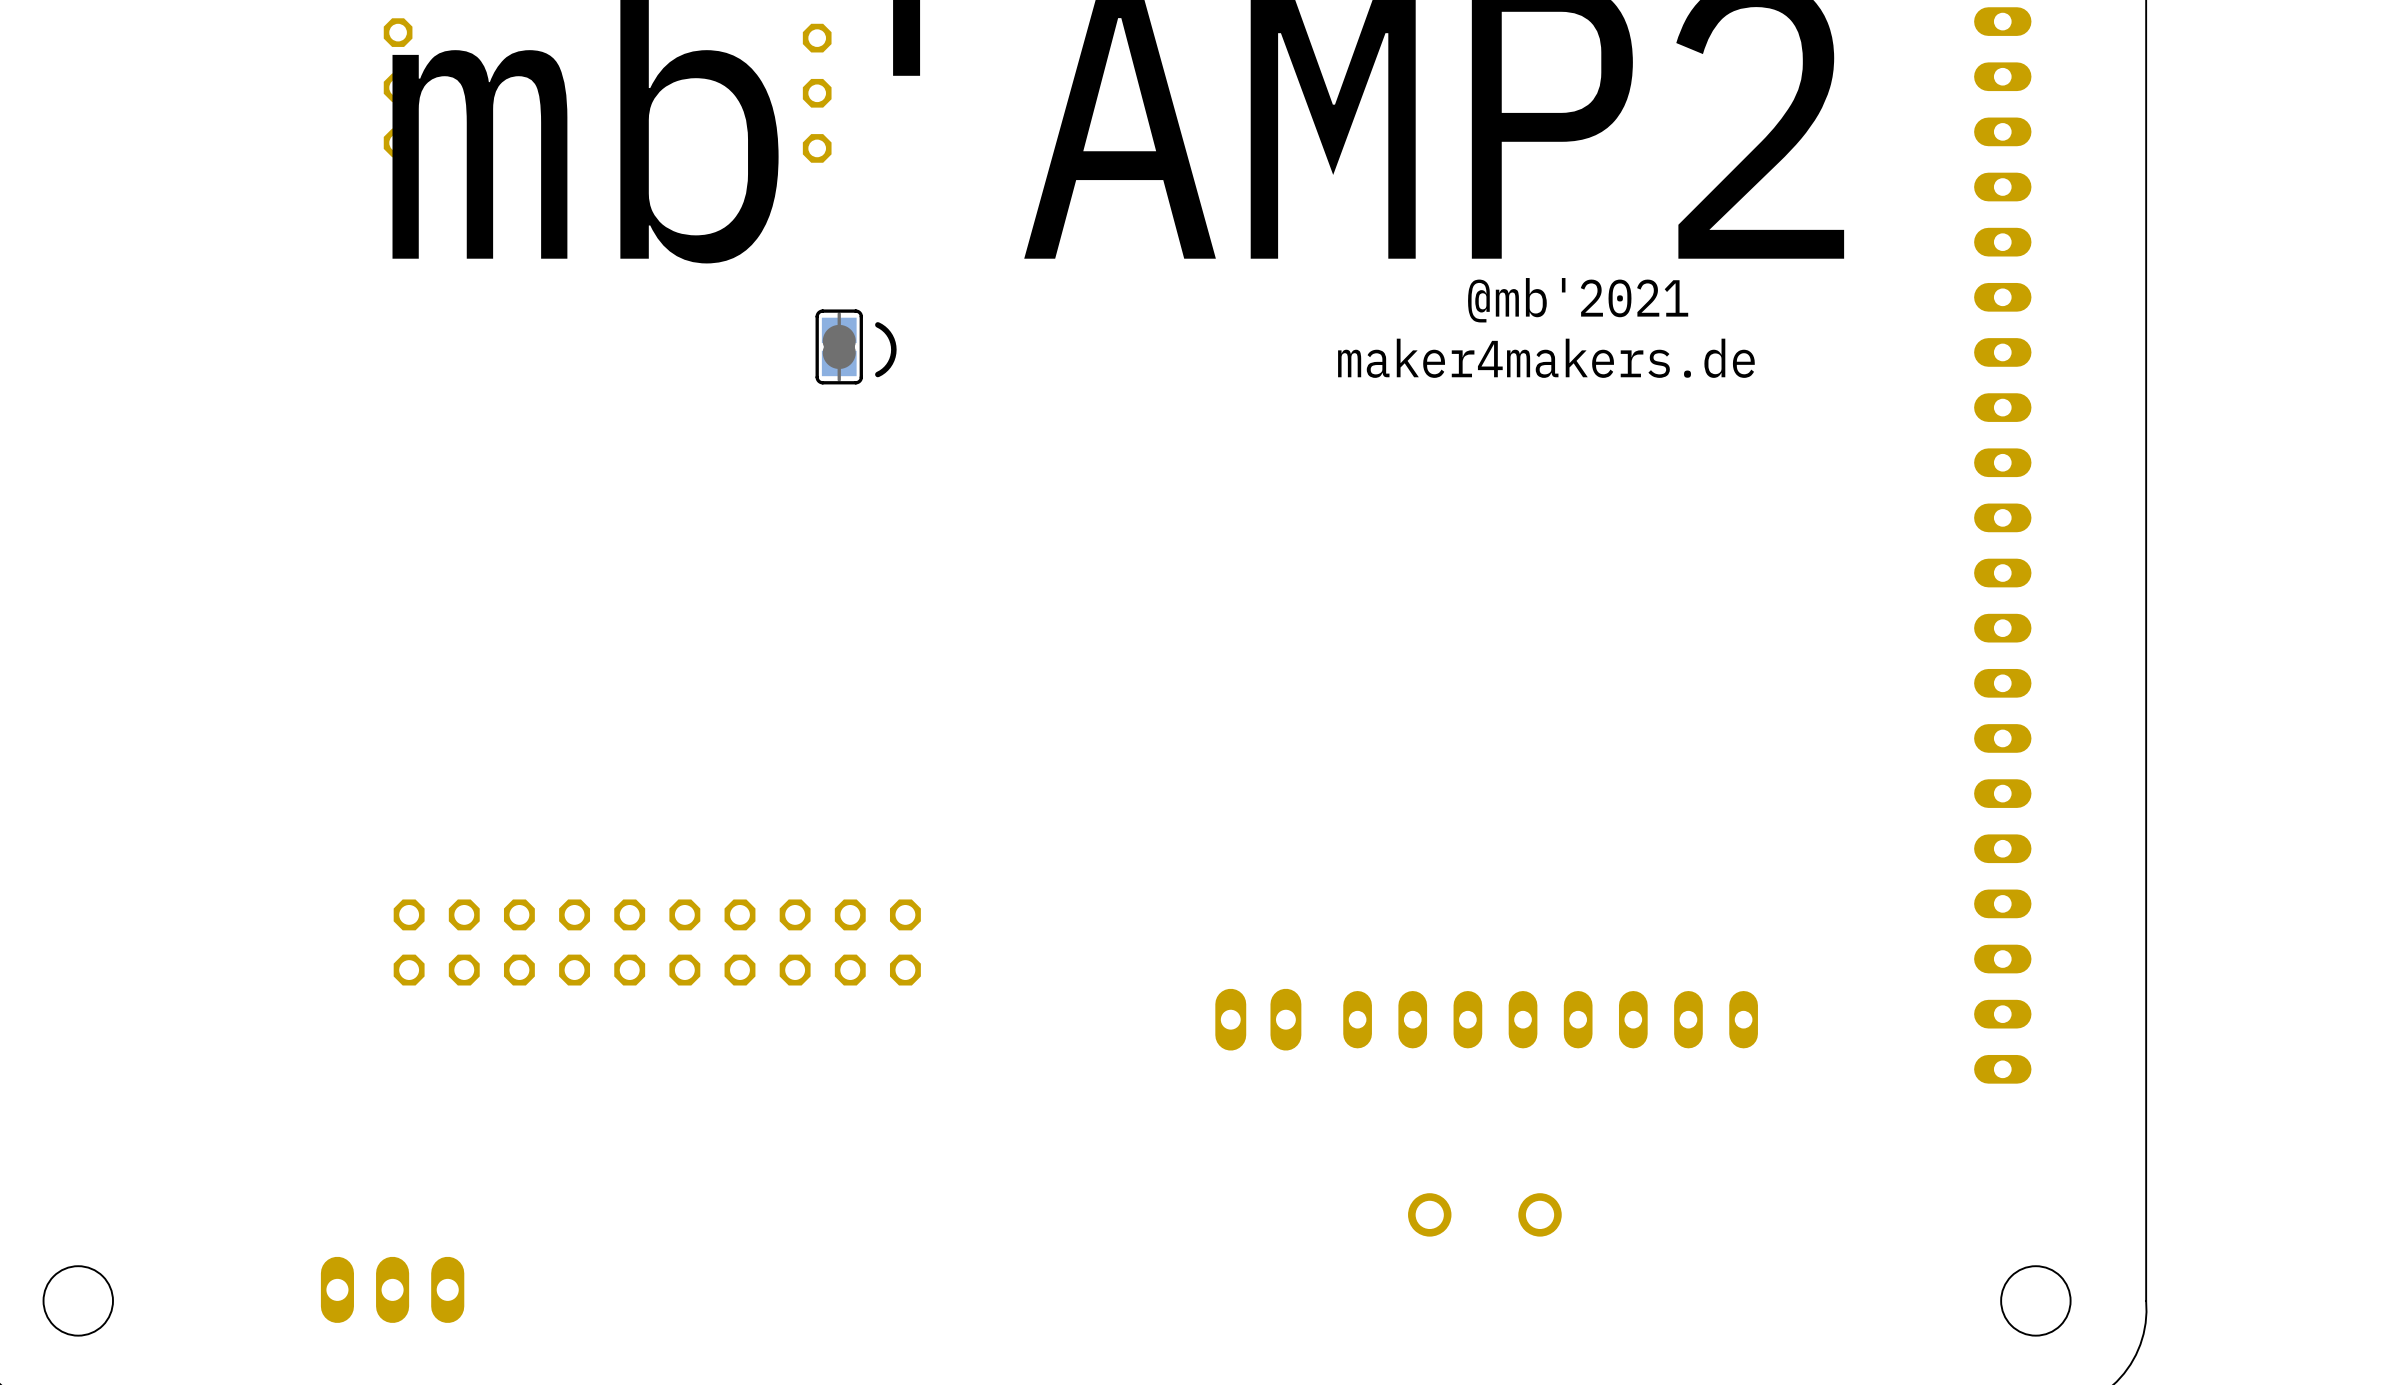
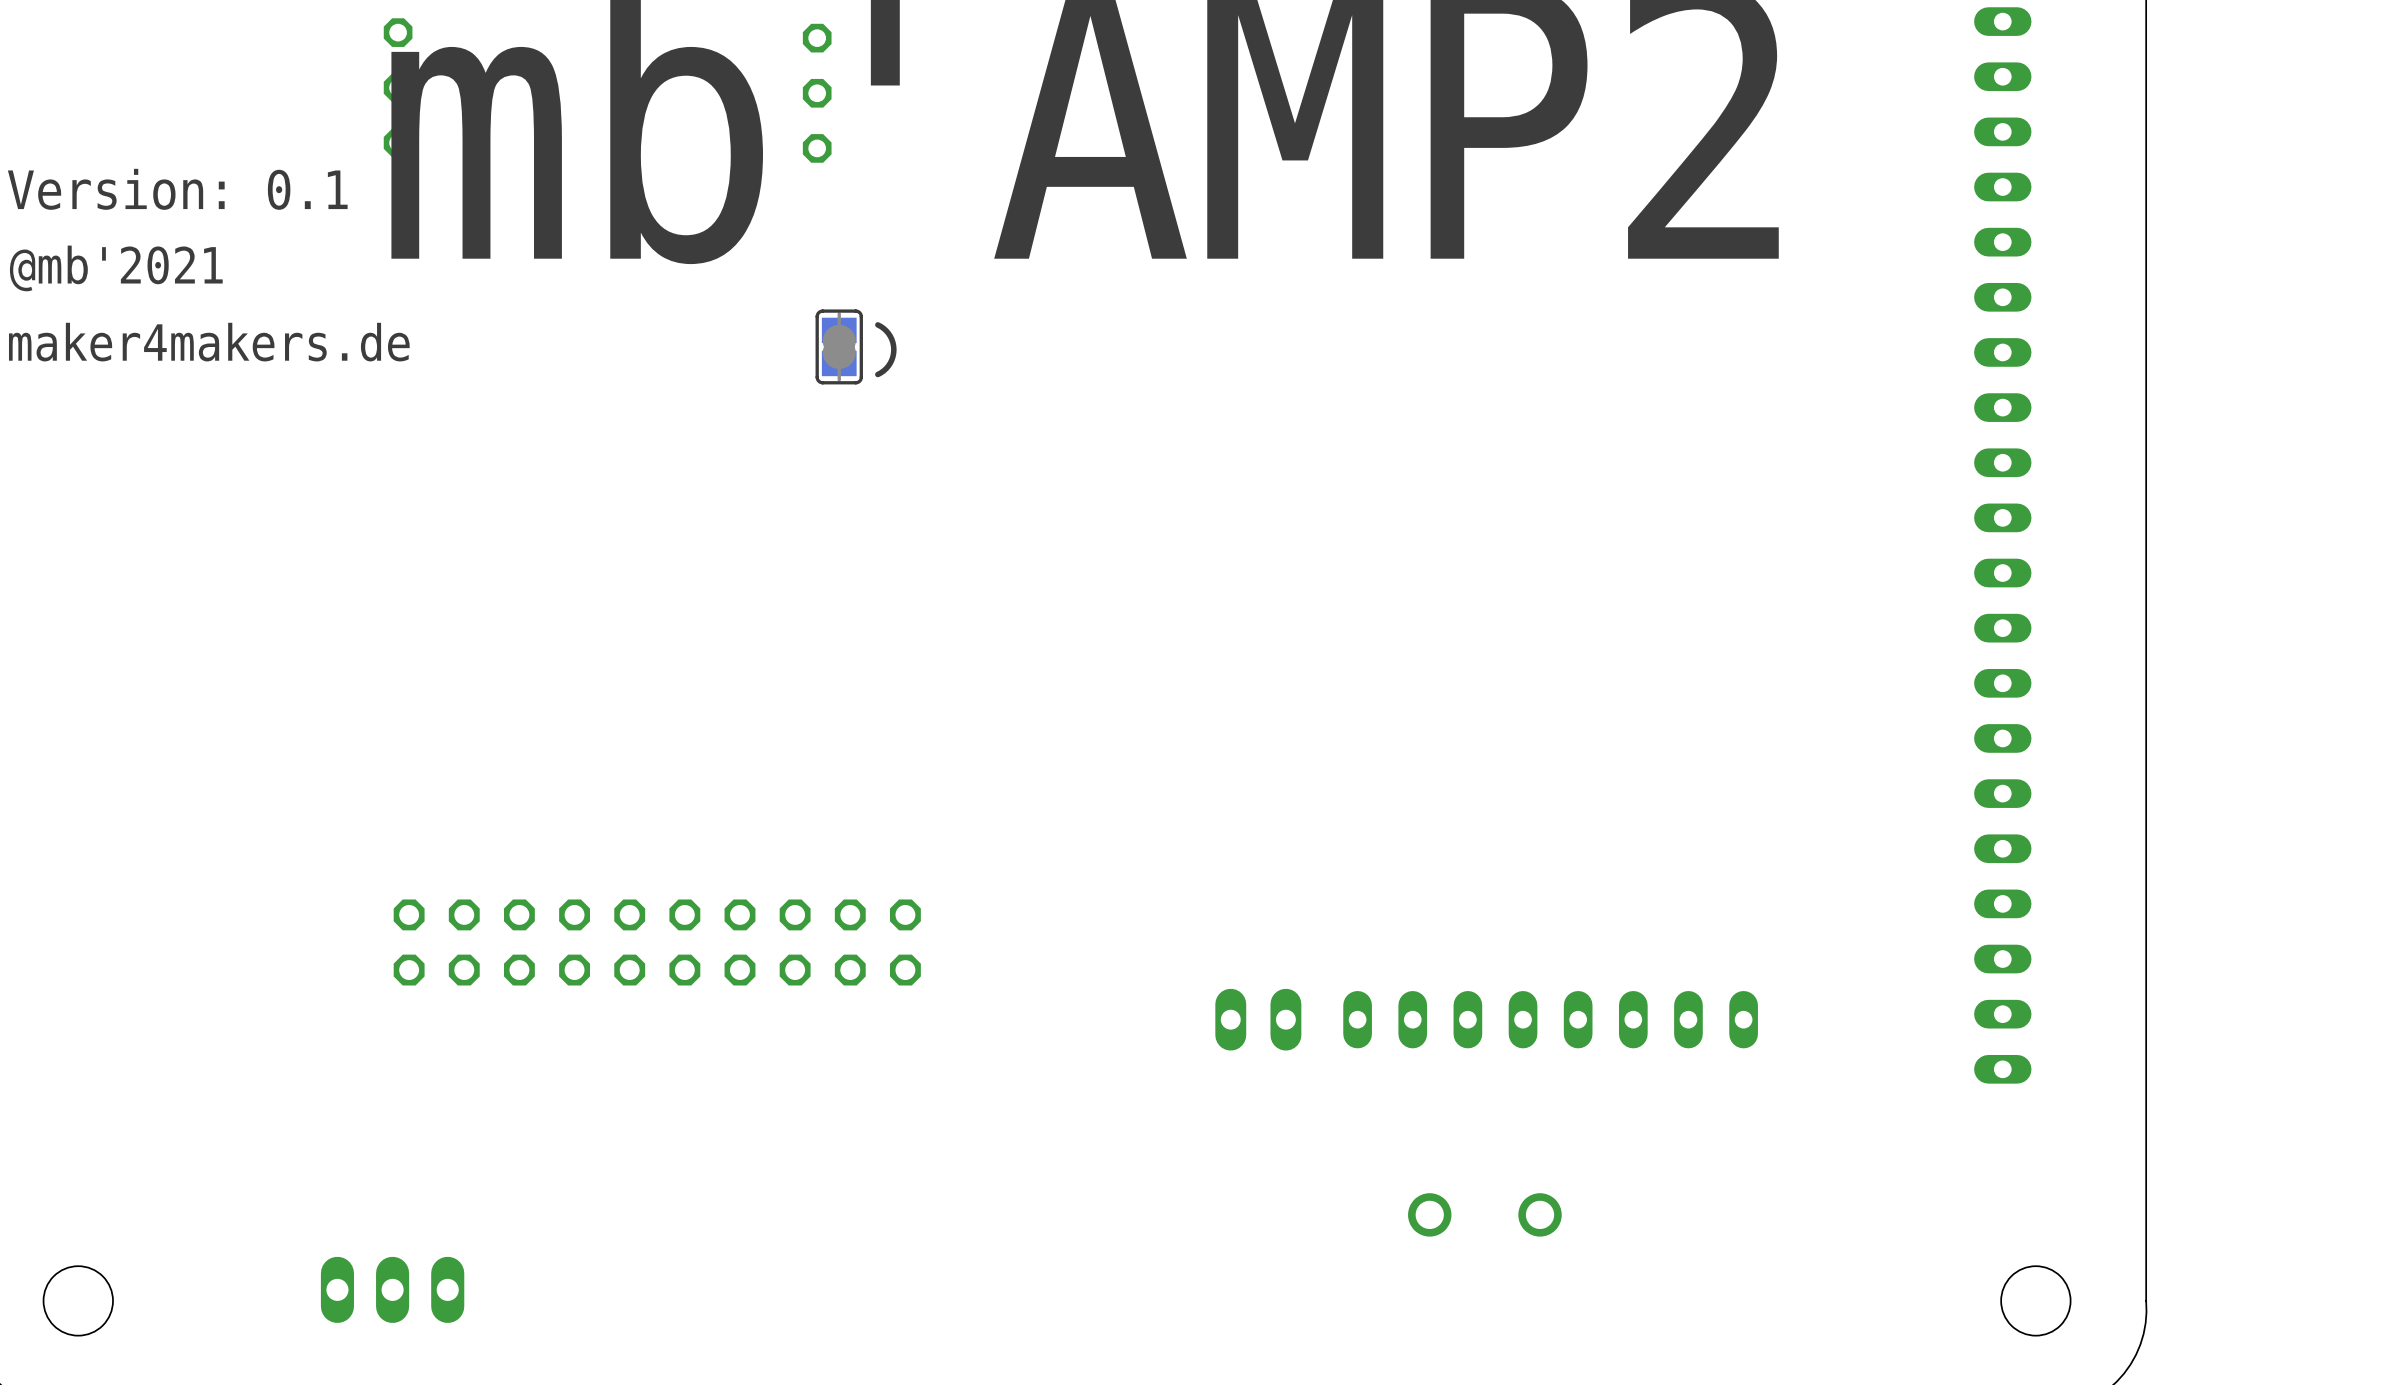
text: none -> Version: 0.1 (177, 189)
text: none -> @mb'2021 (116, 268)
text: @mb'2021 (1578, 300) -> none
text: none -> maker4makers.de (209, 342)
text: maker4makers.de (1546, 358) -> none

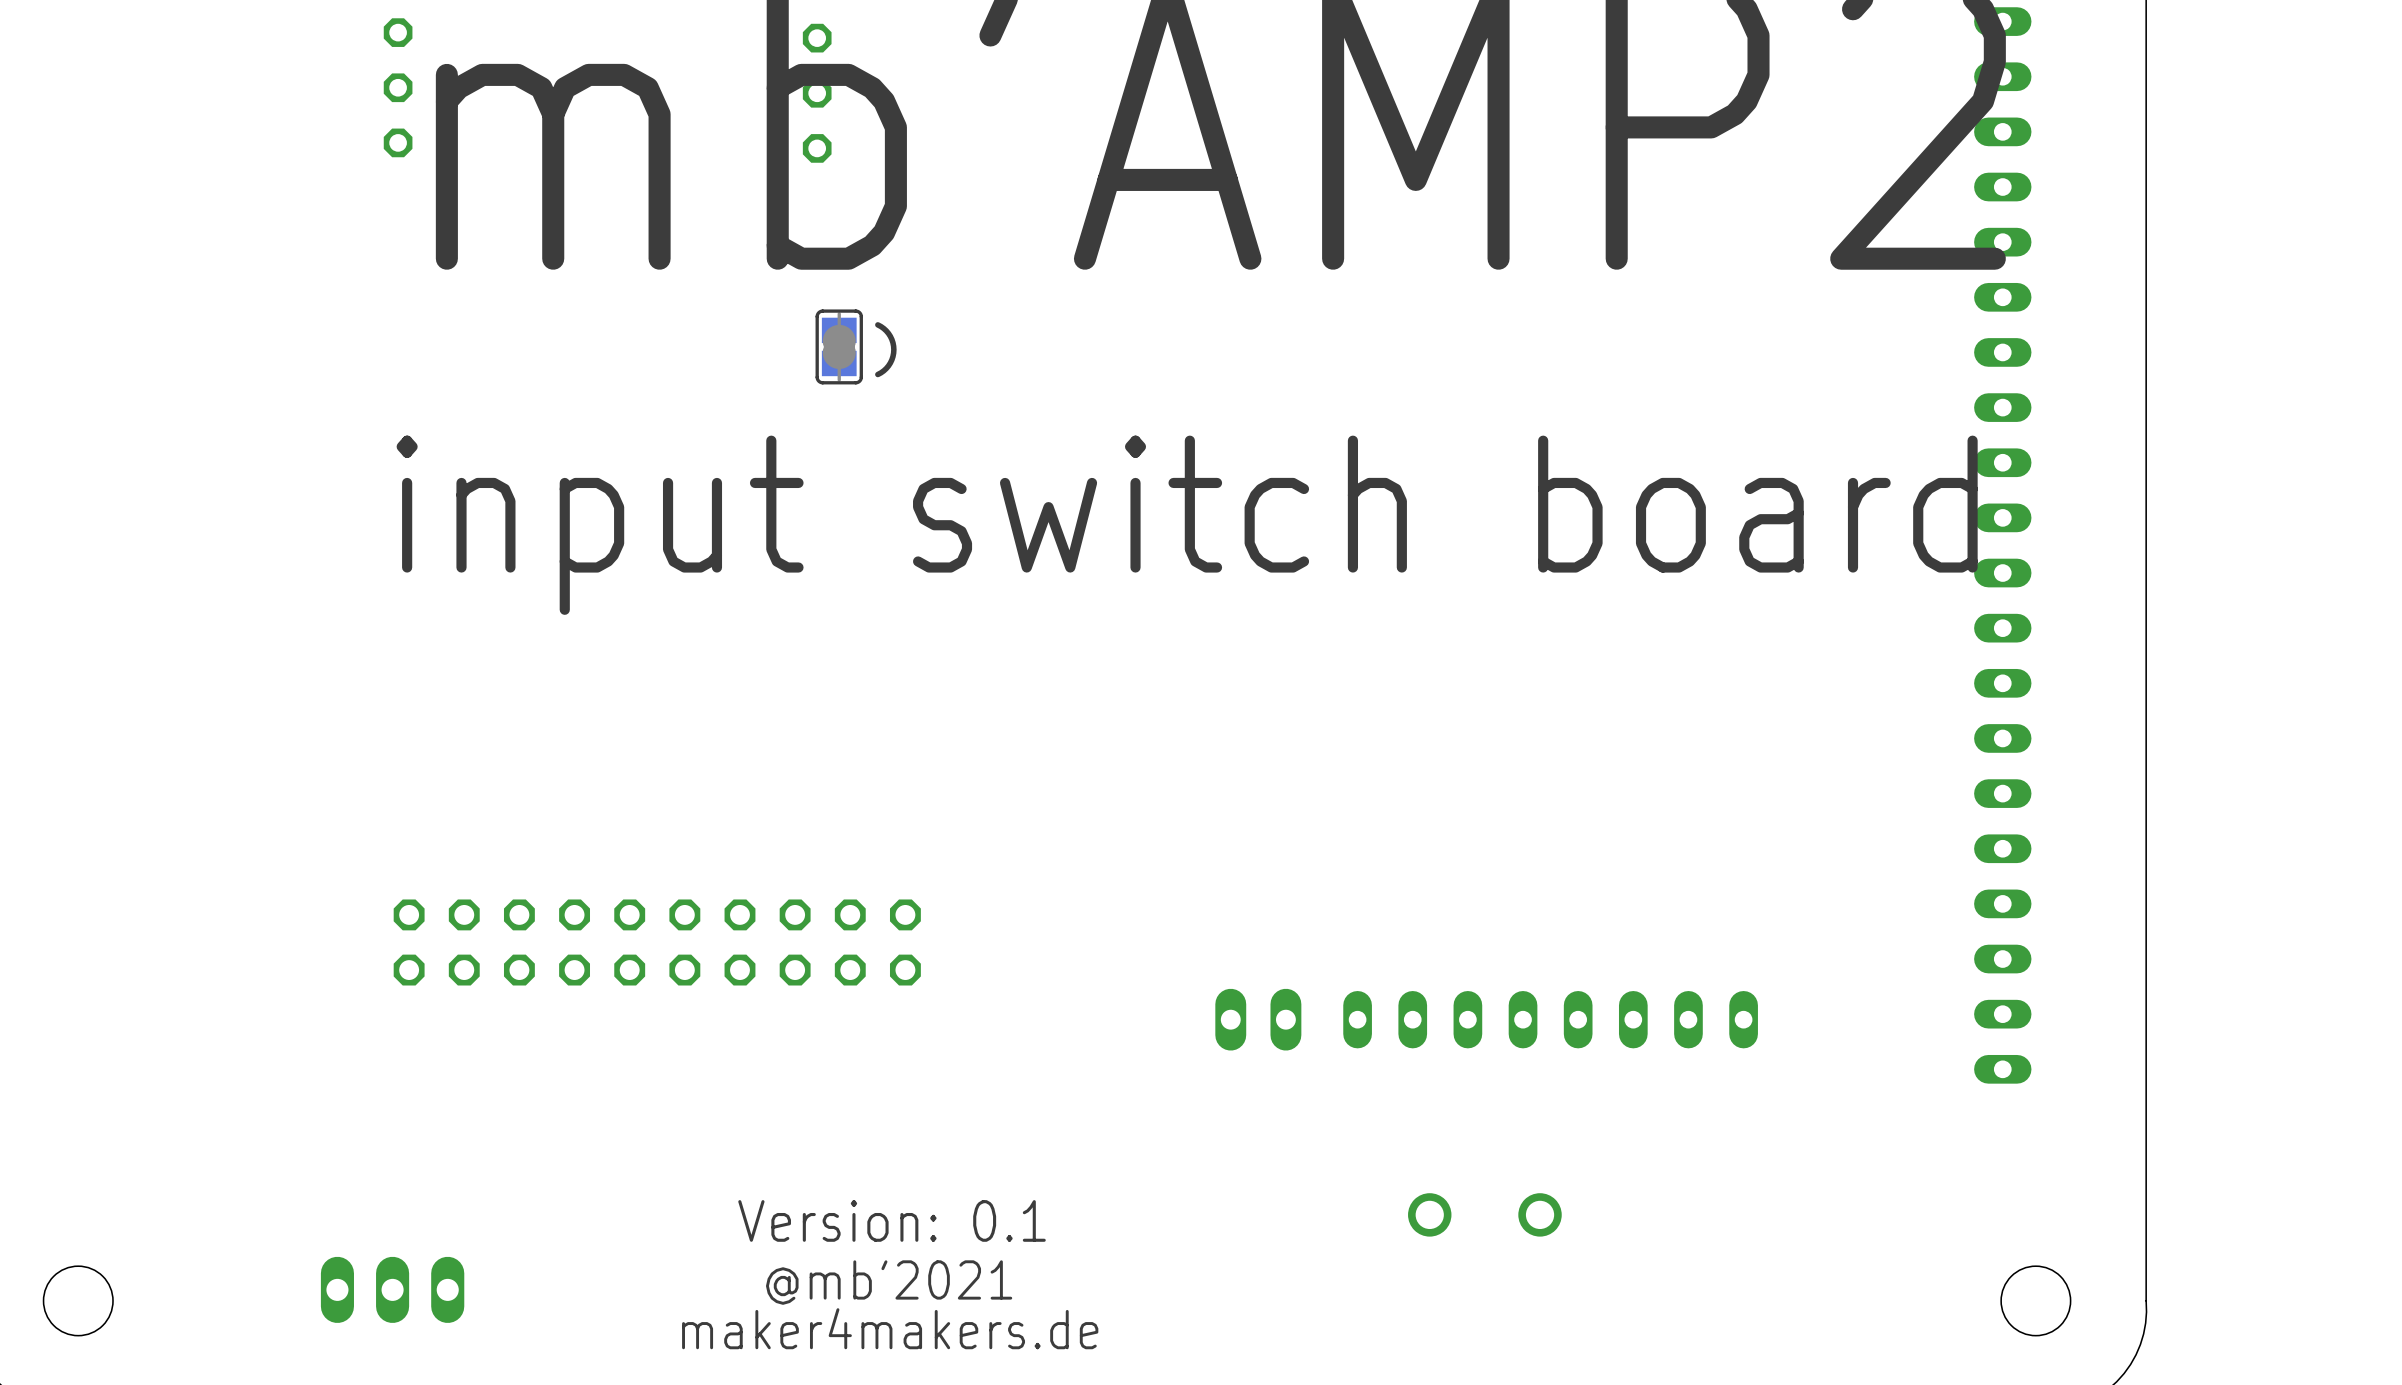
text: Version: 0.1 (177, 189) -> none
text: @mb'2021 (116, 268) -> none
text: maker4makers.de (209, 342) -> none
text: none -> input switch board (1187, 525)
text: none -> Version: 0.1 (892, 1220)
text: none -> @mb'2021 (889, 1282)
text: none -> maker4makers.de (890, 1328)

